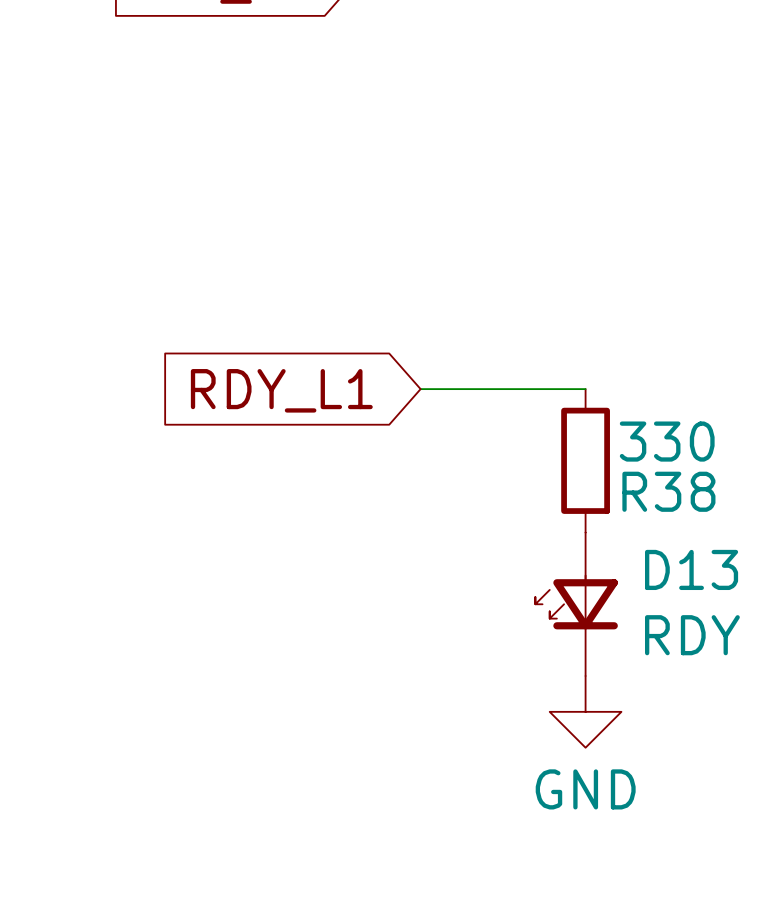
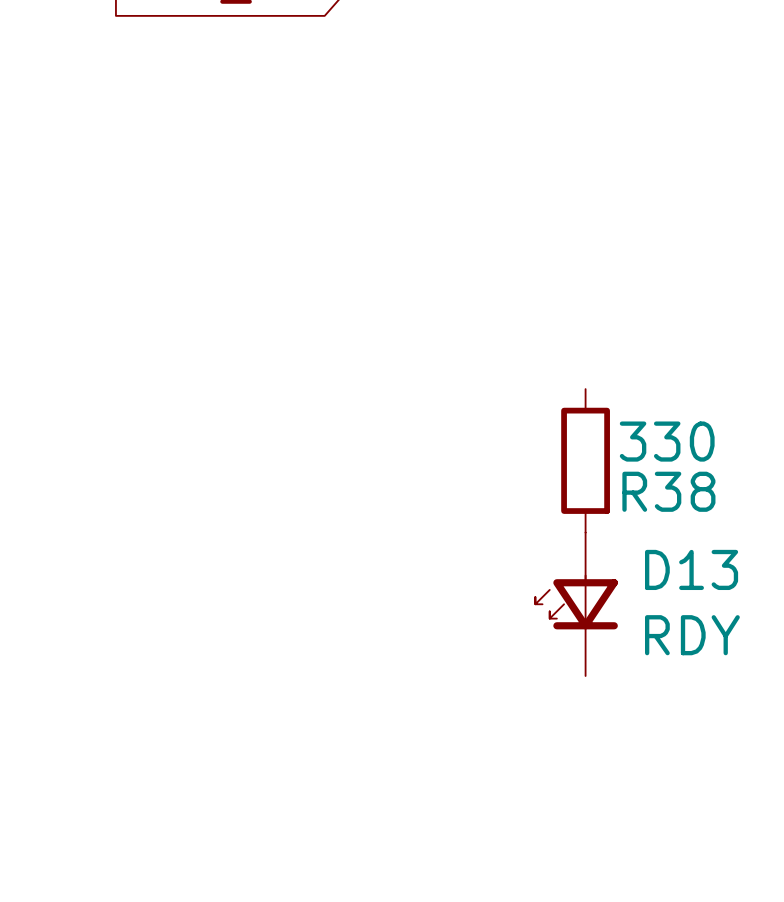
wire: (420, 389) (585, 389) -> none
global label: RDY_L1 (281, 390) -> none
power symbol: GND (585, 711) -> none

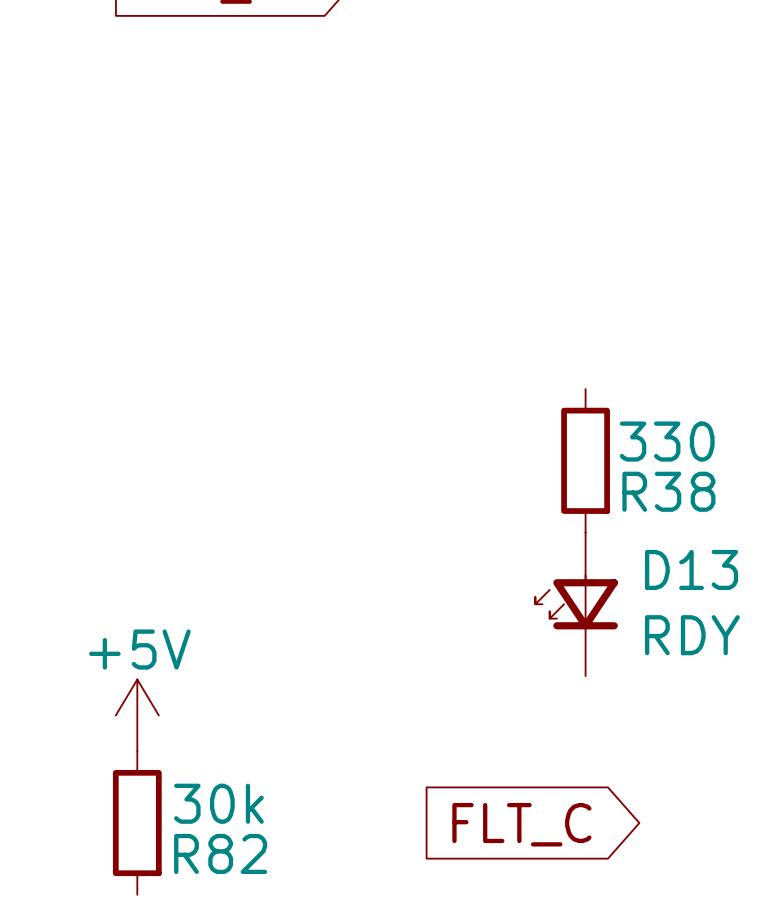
power symbol: none -> +5V (137, 715)
R82: none -> 30k (137, 823)
global label: none -> FLT_C (521, 824)

